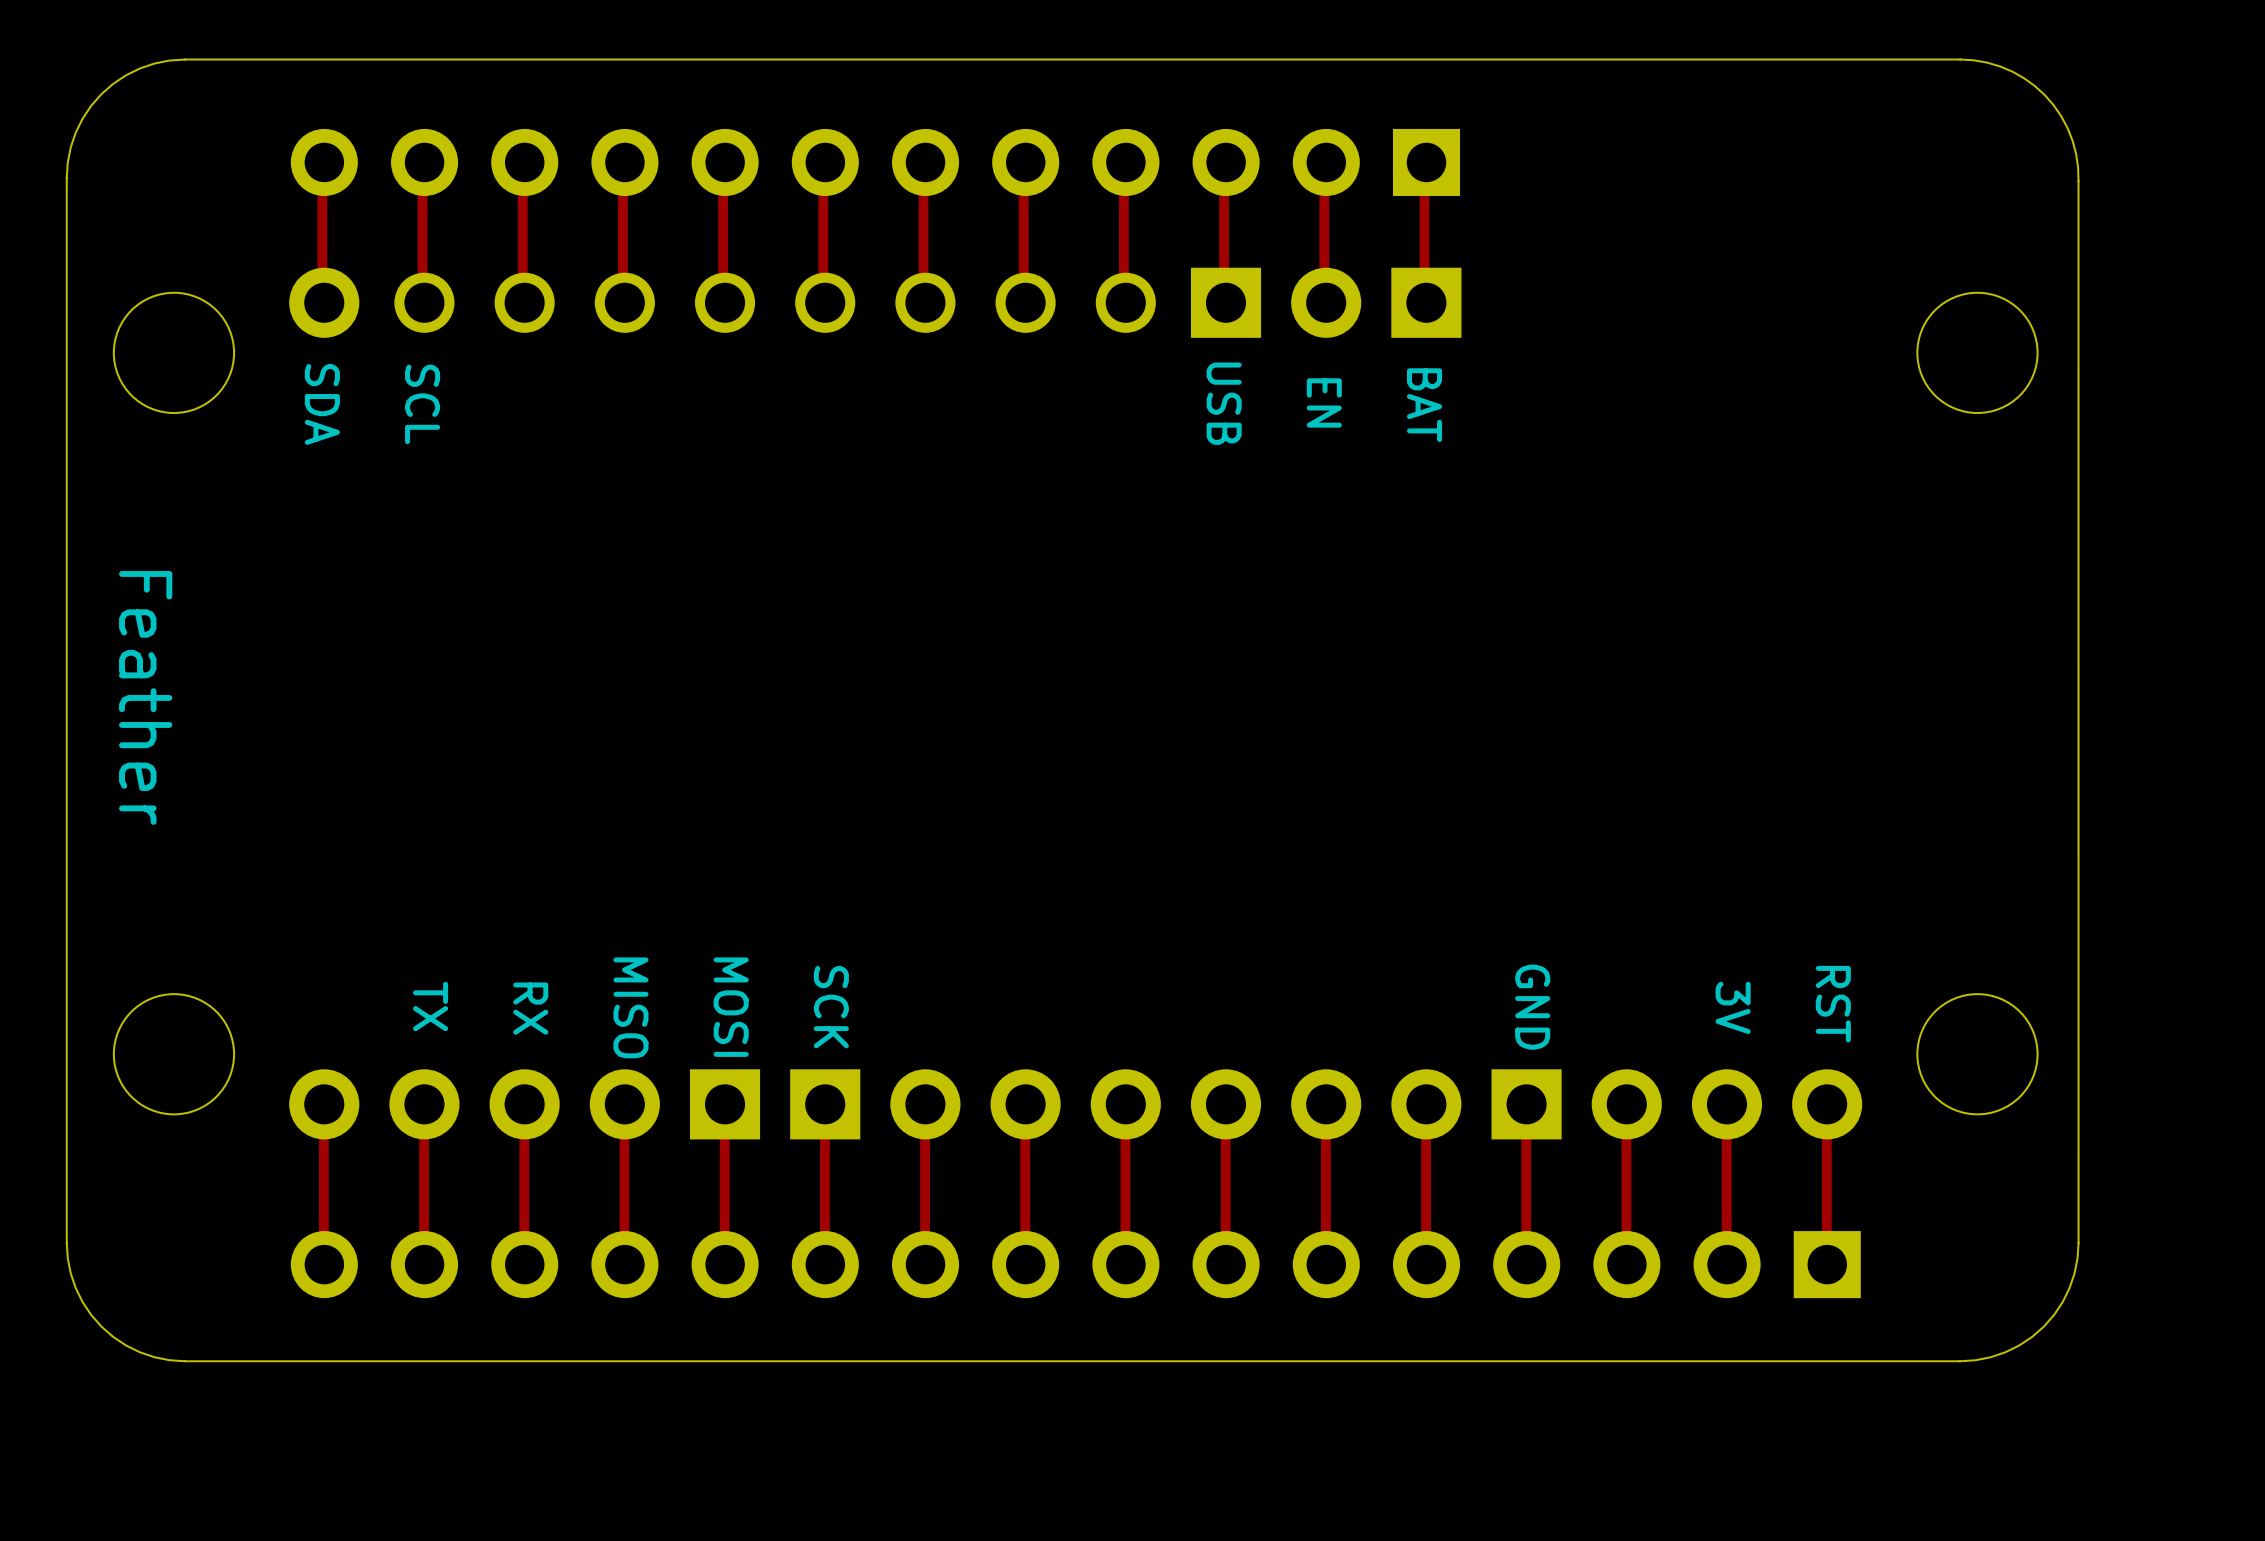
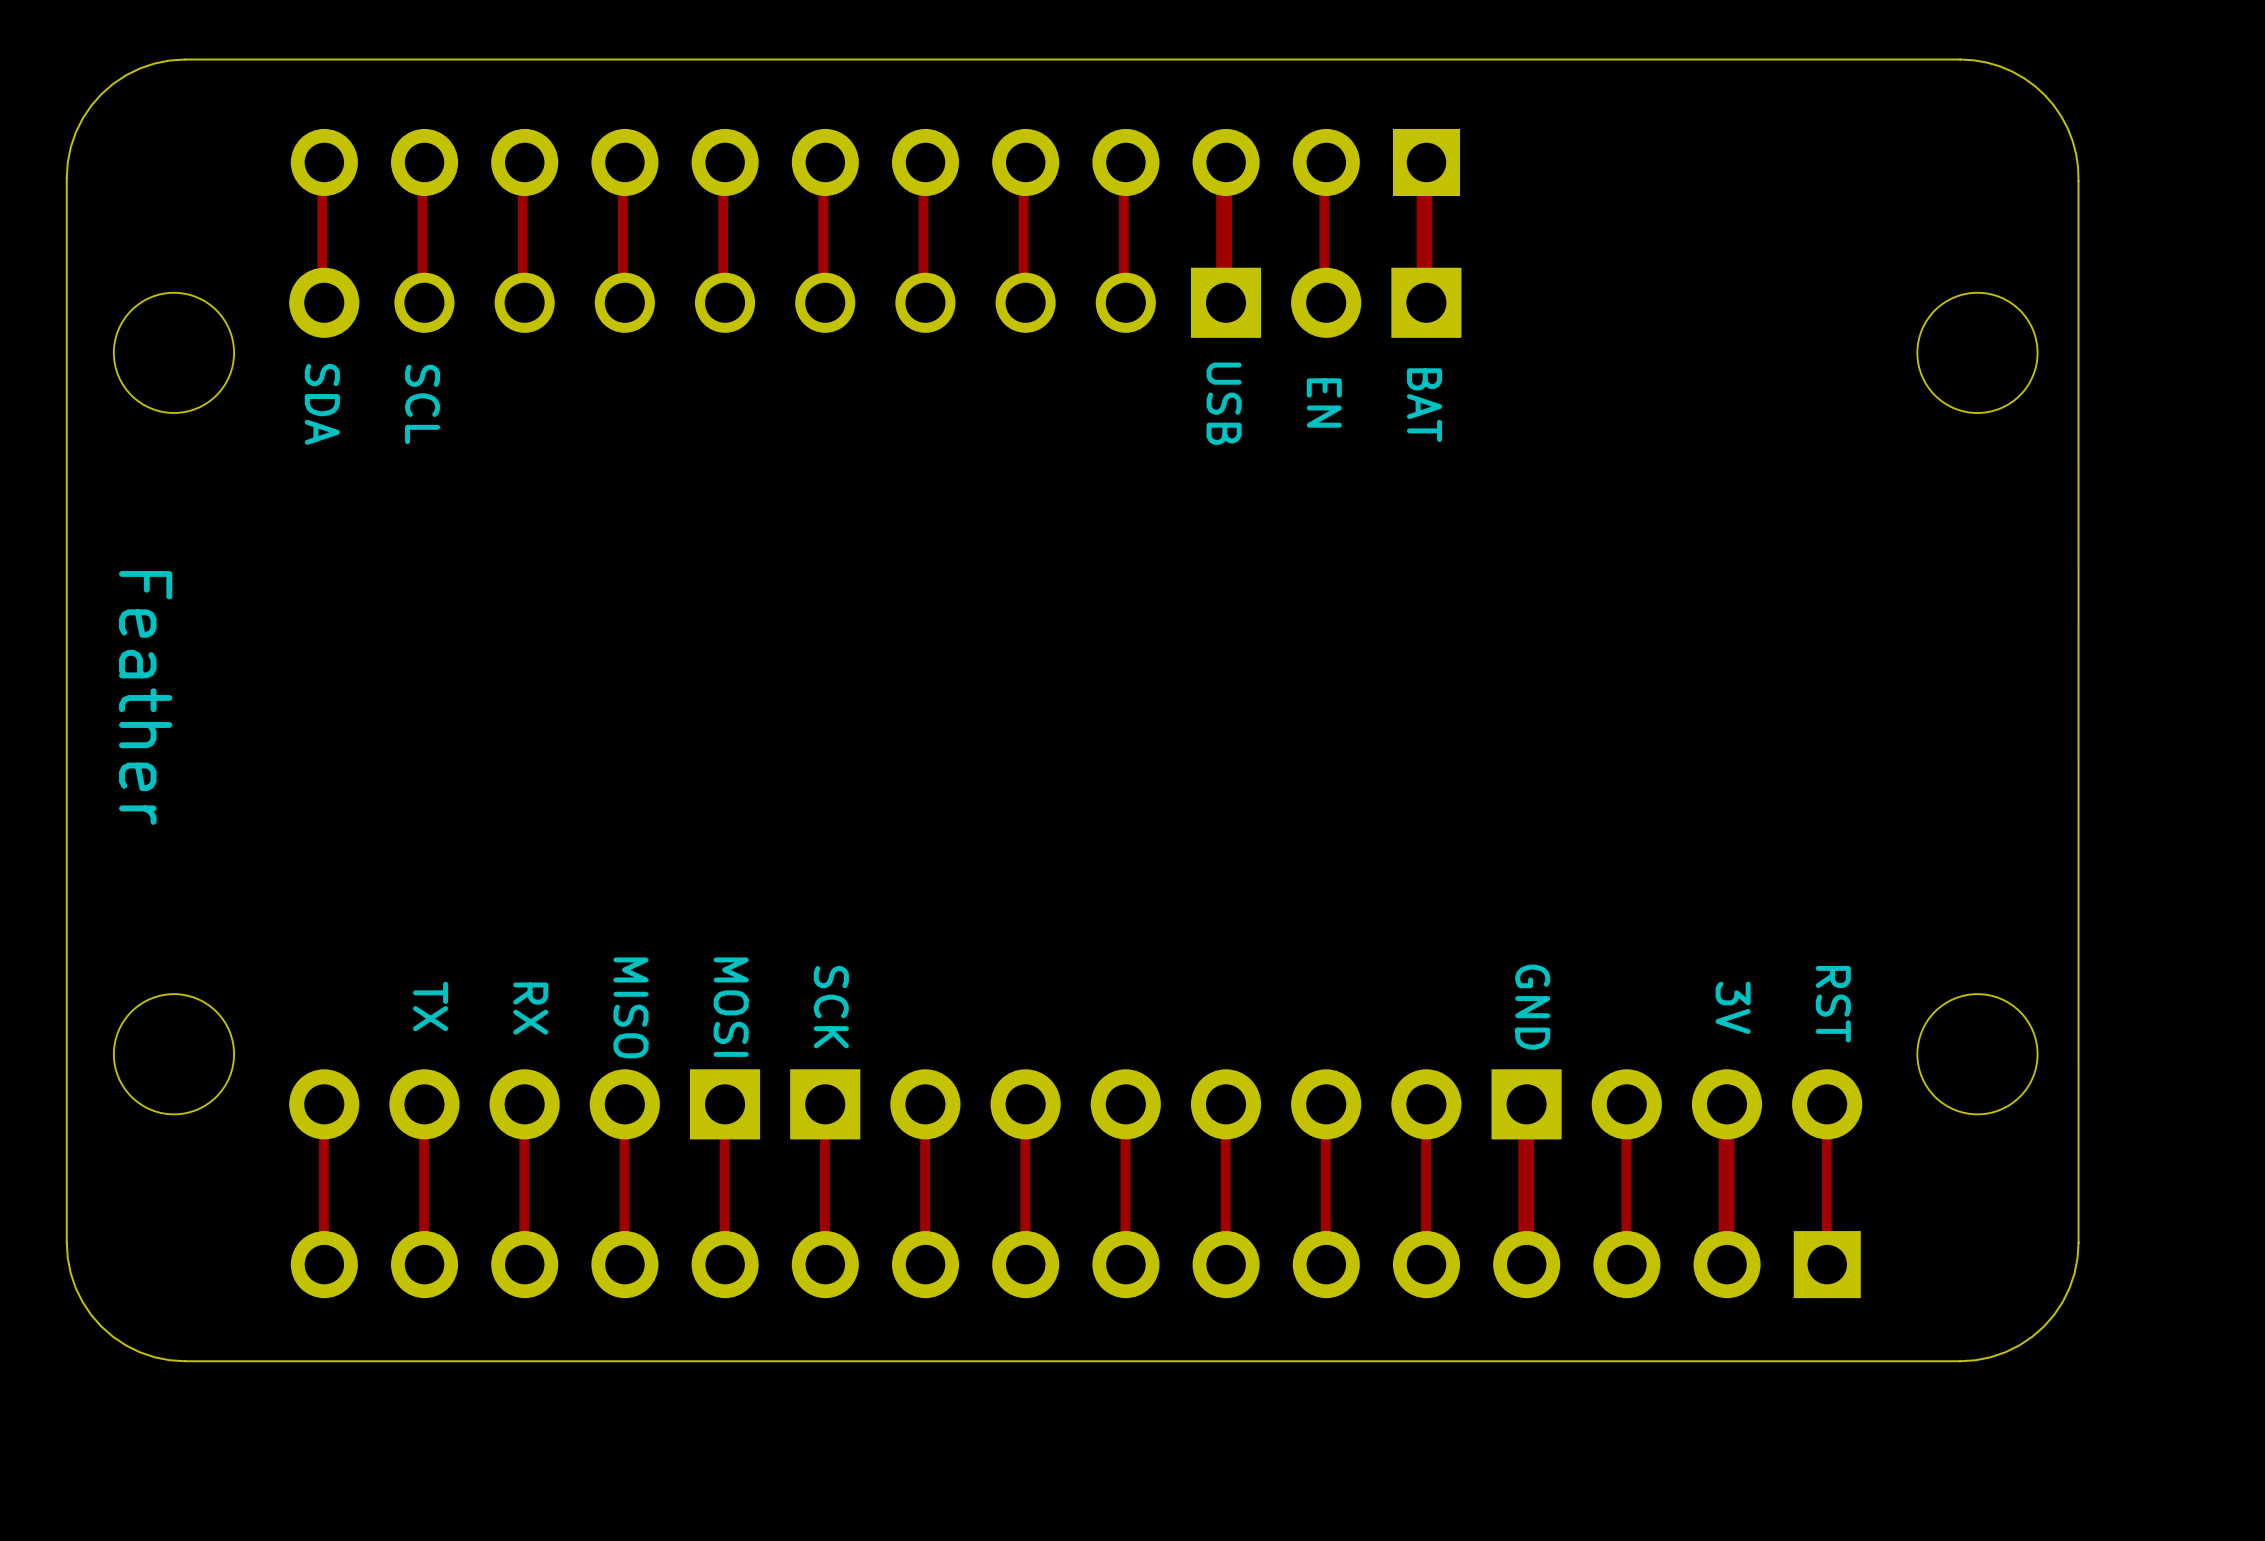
top track width: thin (1224, 162) (1224, 311) (1225, 312) -> thick (1224, 162) (1224, 311) (1225, 312)
top track width: thin (1424, 162) (1424, 311) (1426, 312) -> thick (1424, 162) (1424, 311) (1426, 312)
top track width: thin (1526, 1114) (1525, 1264) -> thick (1526, 1114) (1525, 1264)
top track width: thin (1726, 1114) (1725, 1264) -> thick (1726, 1114) (1725, 1264)

